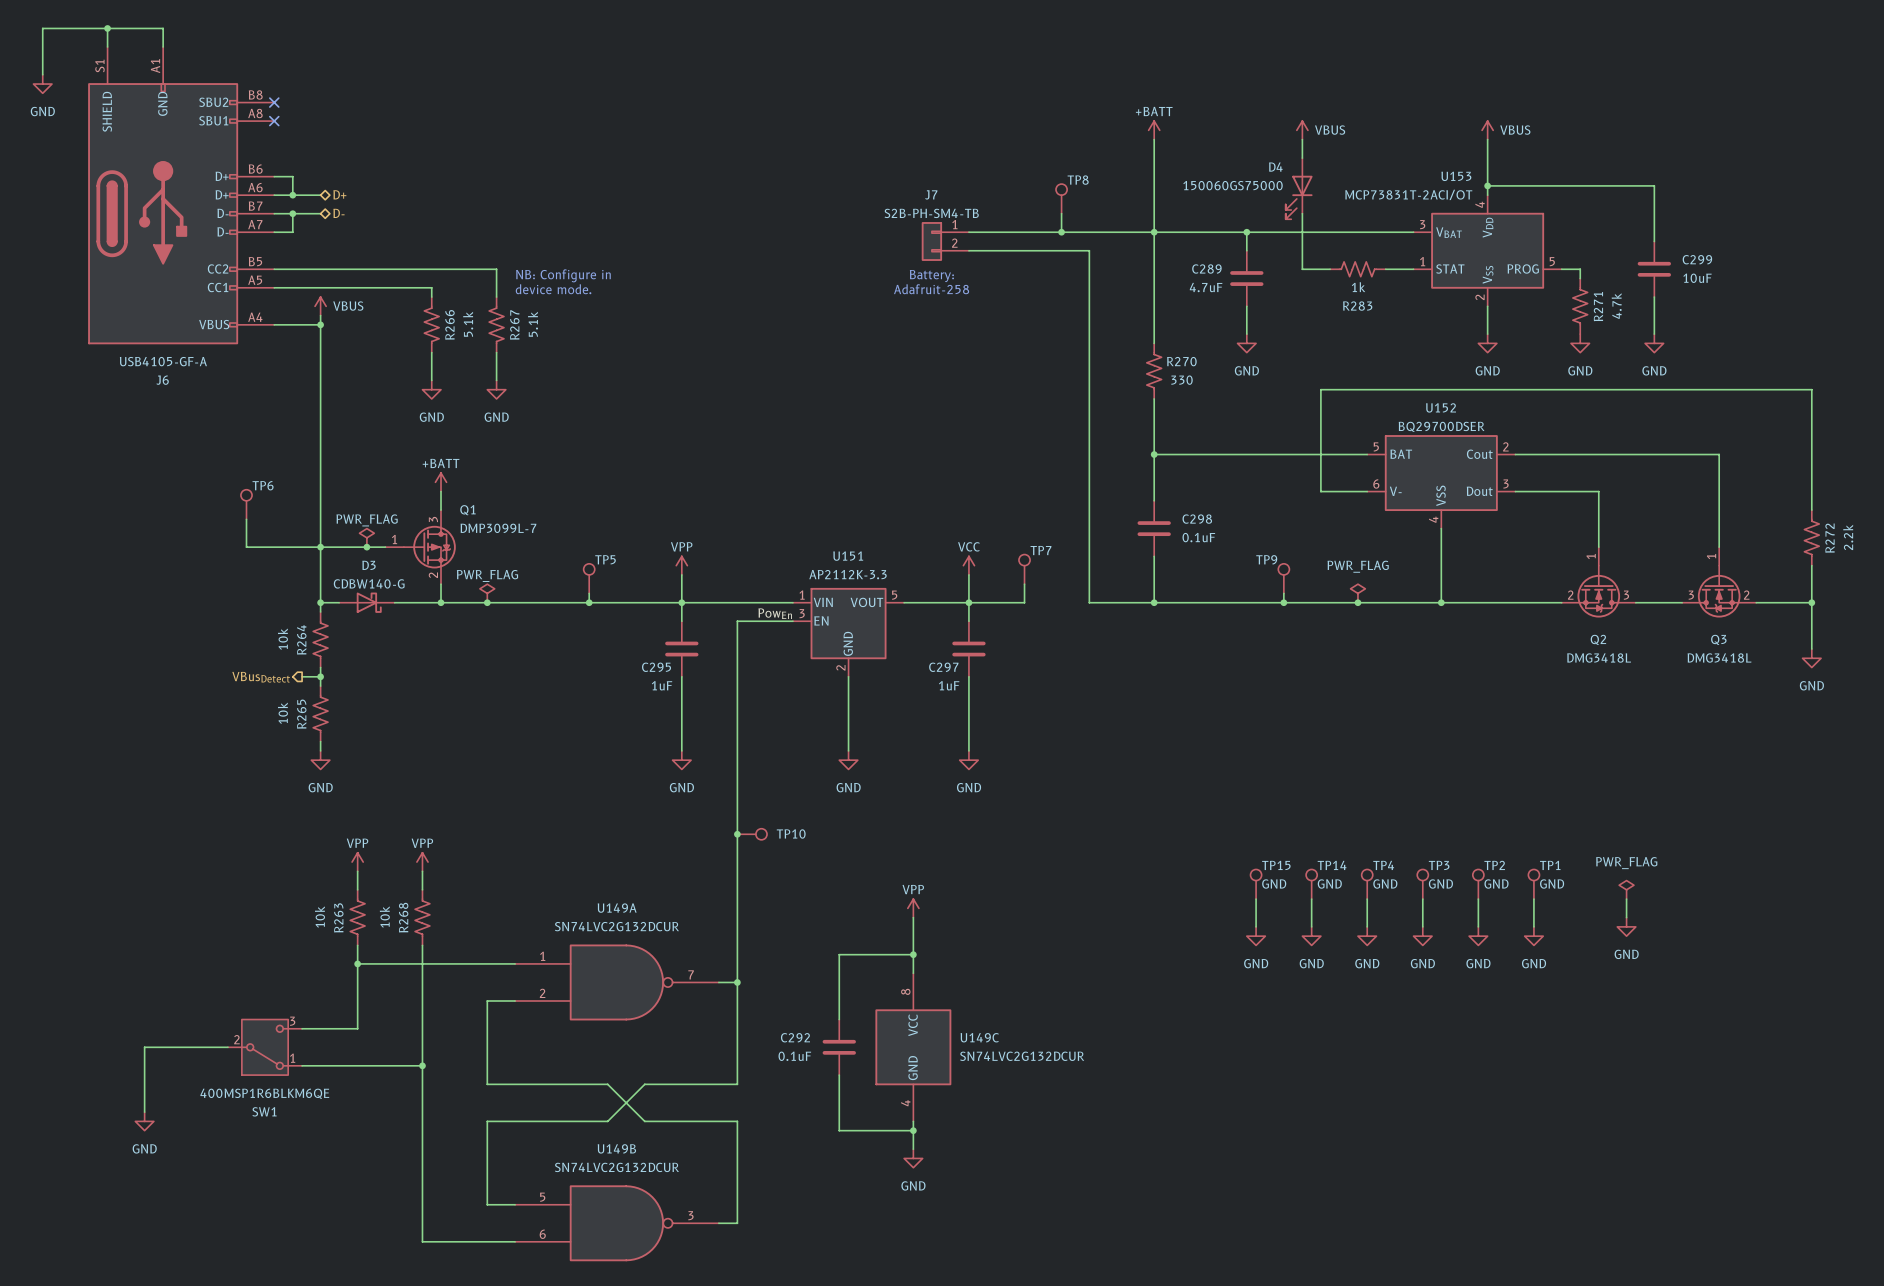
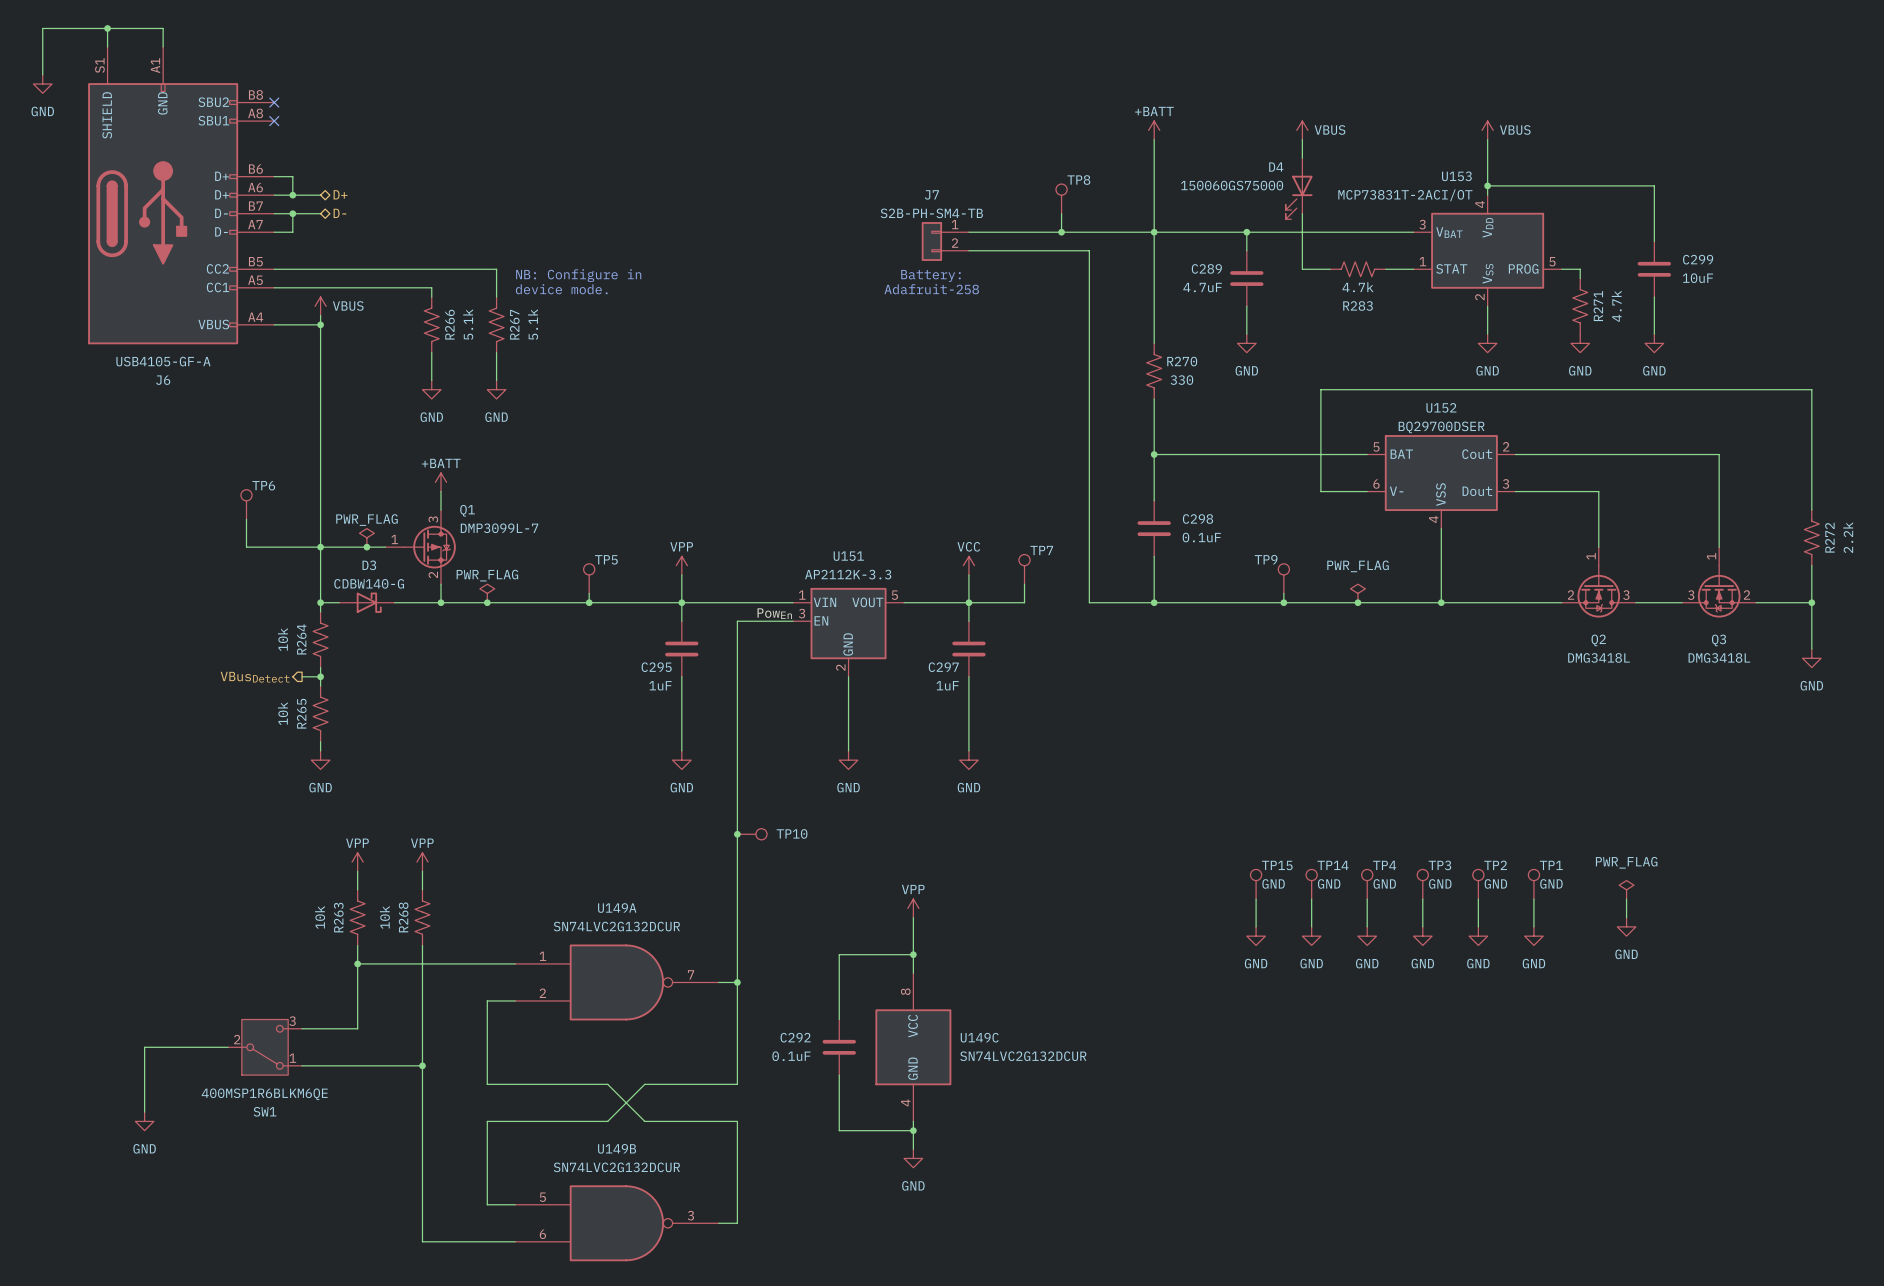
R283 value: 1k (1358, 287) -> 4.7k (1358, 287)

